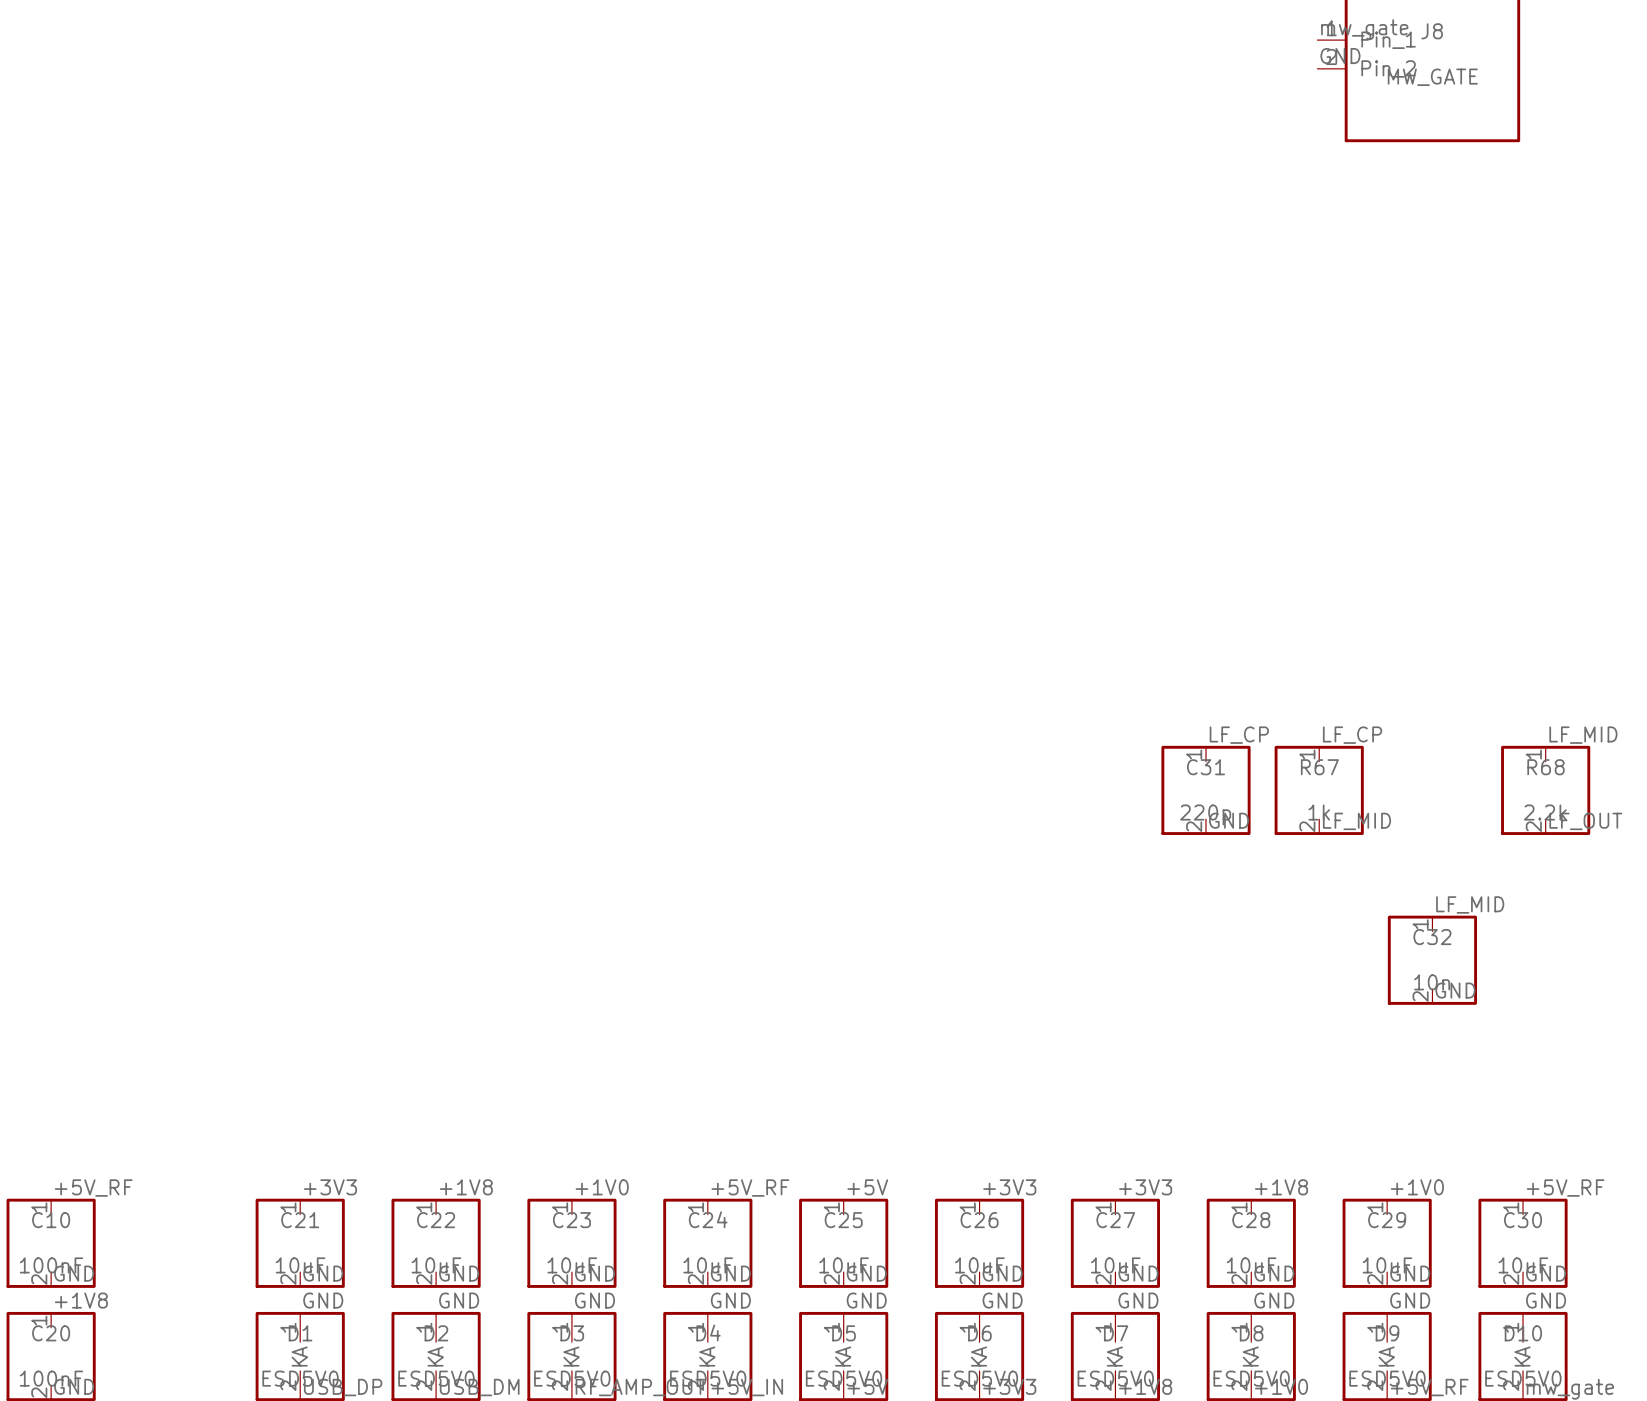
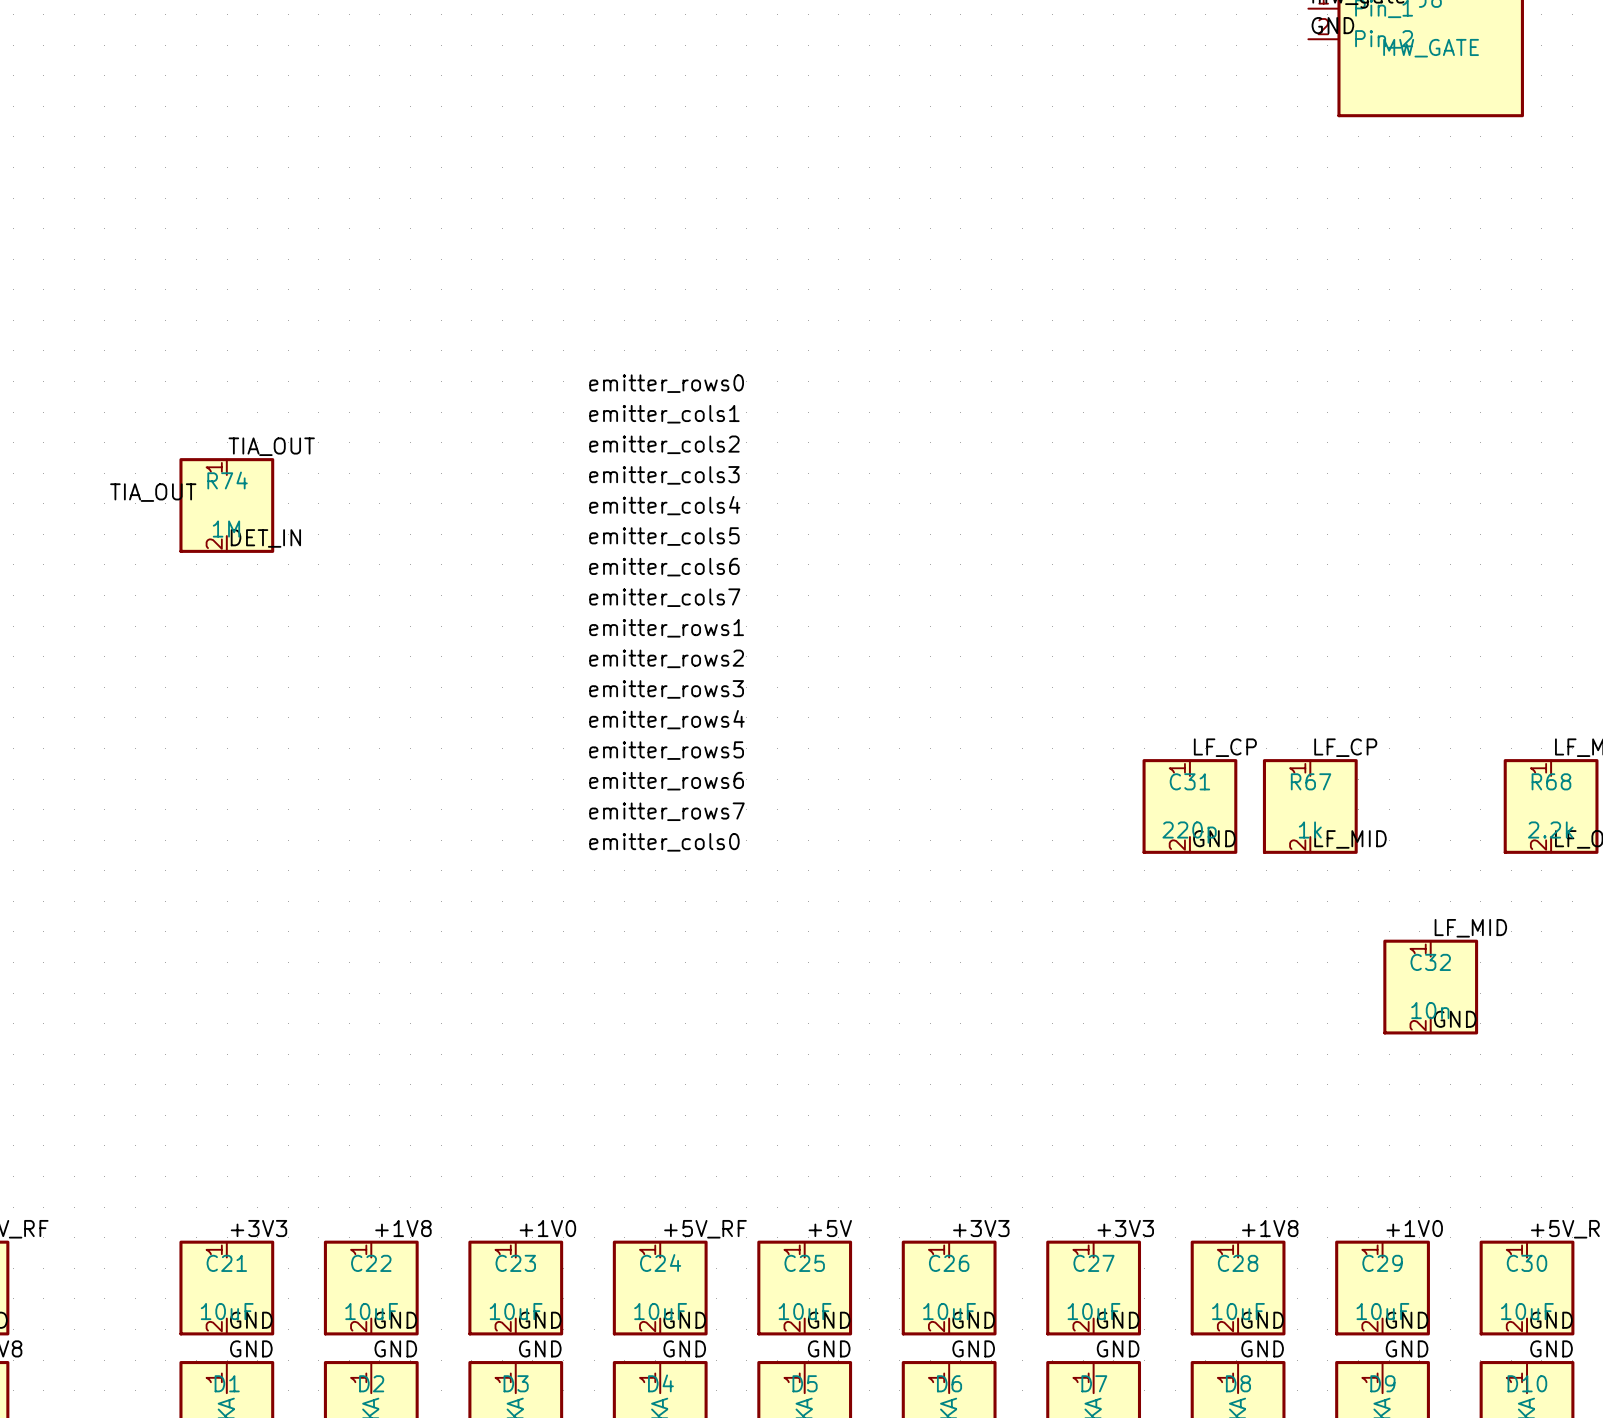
label: none -> emitter_rows0 (666, 383)
label: none -> emitter_cols1 (664, 414)
label: none -> emitter_cols2 (664, 444)
label: none -> TIA_OUT (271, 446)
label: none -> emitter_cols3 (664, 475)
label: none -> TIA_OUT (153, 492)
R74: none -> 1M (226, 505)
label: none -> emitter_cols4 (664, 505)
label: none -> emitter_cols5 (664, 536)
label: none -> DET_IN (265, 538)
label: none -> emitter_cols6 (664, 567)
label: none -> emitter_cols7 (664, 597)
label: none -> emitter_rows1 (666, 628)
label: none -> emitter_rows2 (666, 658)
label: none -> emitter_rows3 (666, 689)
label: none -> emitter_rows4 (666, 719)
label: none -> emitter_rows5 (666, 750)
label: none -> emitter_rows6 (666, 781)
label: none -> emitter_rows7 (666, 811)
label: none -> emitter_cols0 (664, 842)

